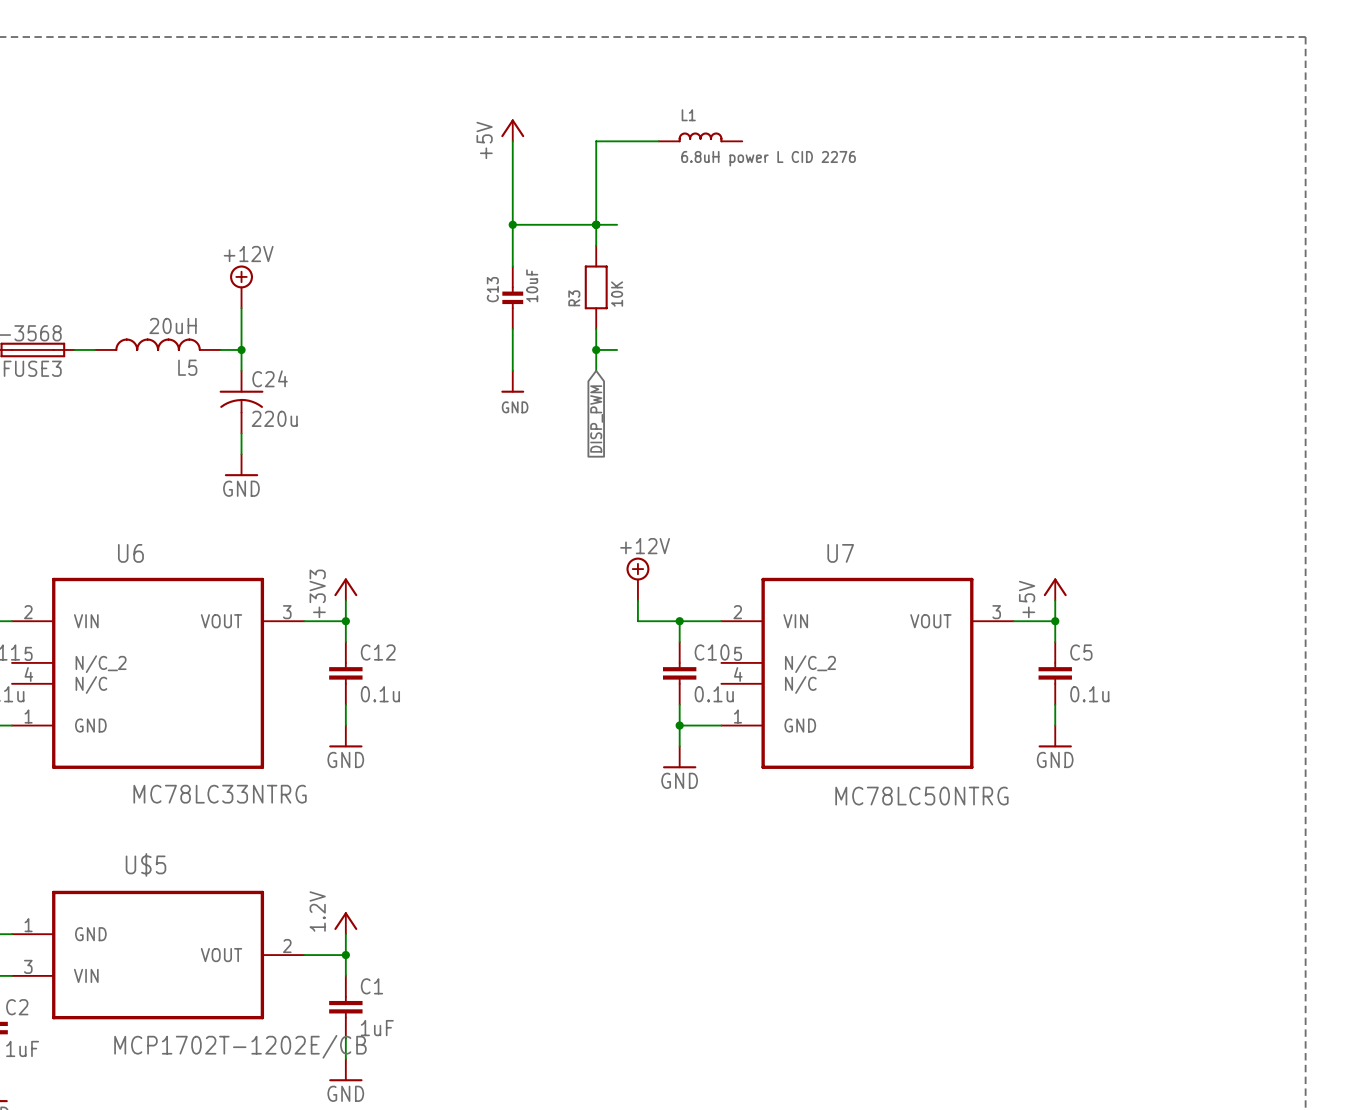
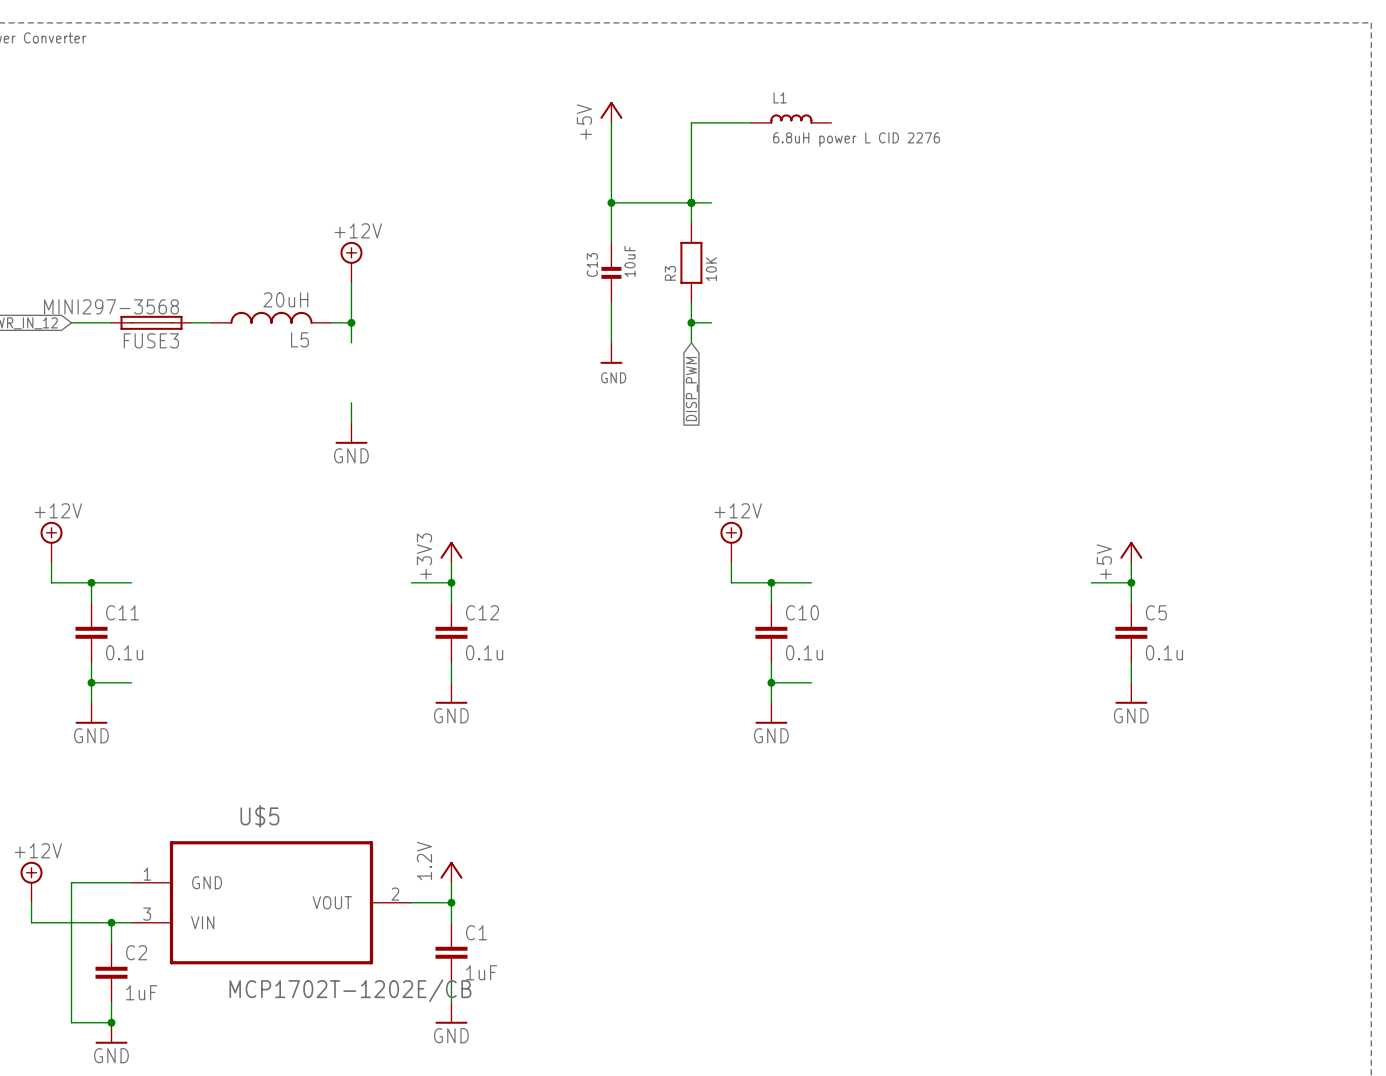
C24: 220u (241, 402) -> none
U6: MC78LC33NTRG (158, 673) -> none
U7: MC78LC50NTRG (867, 673) -> none

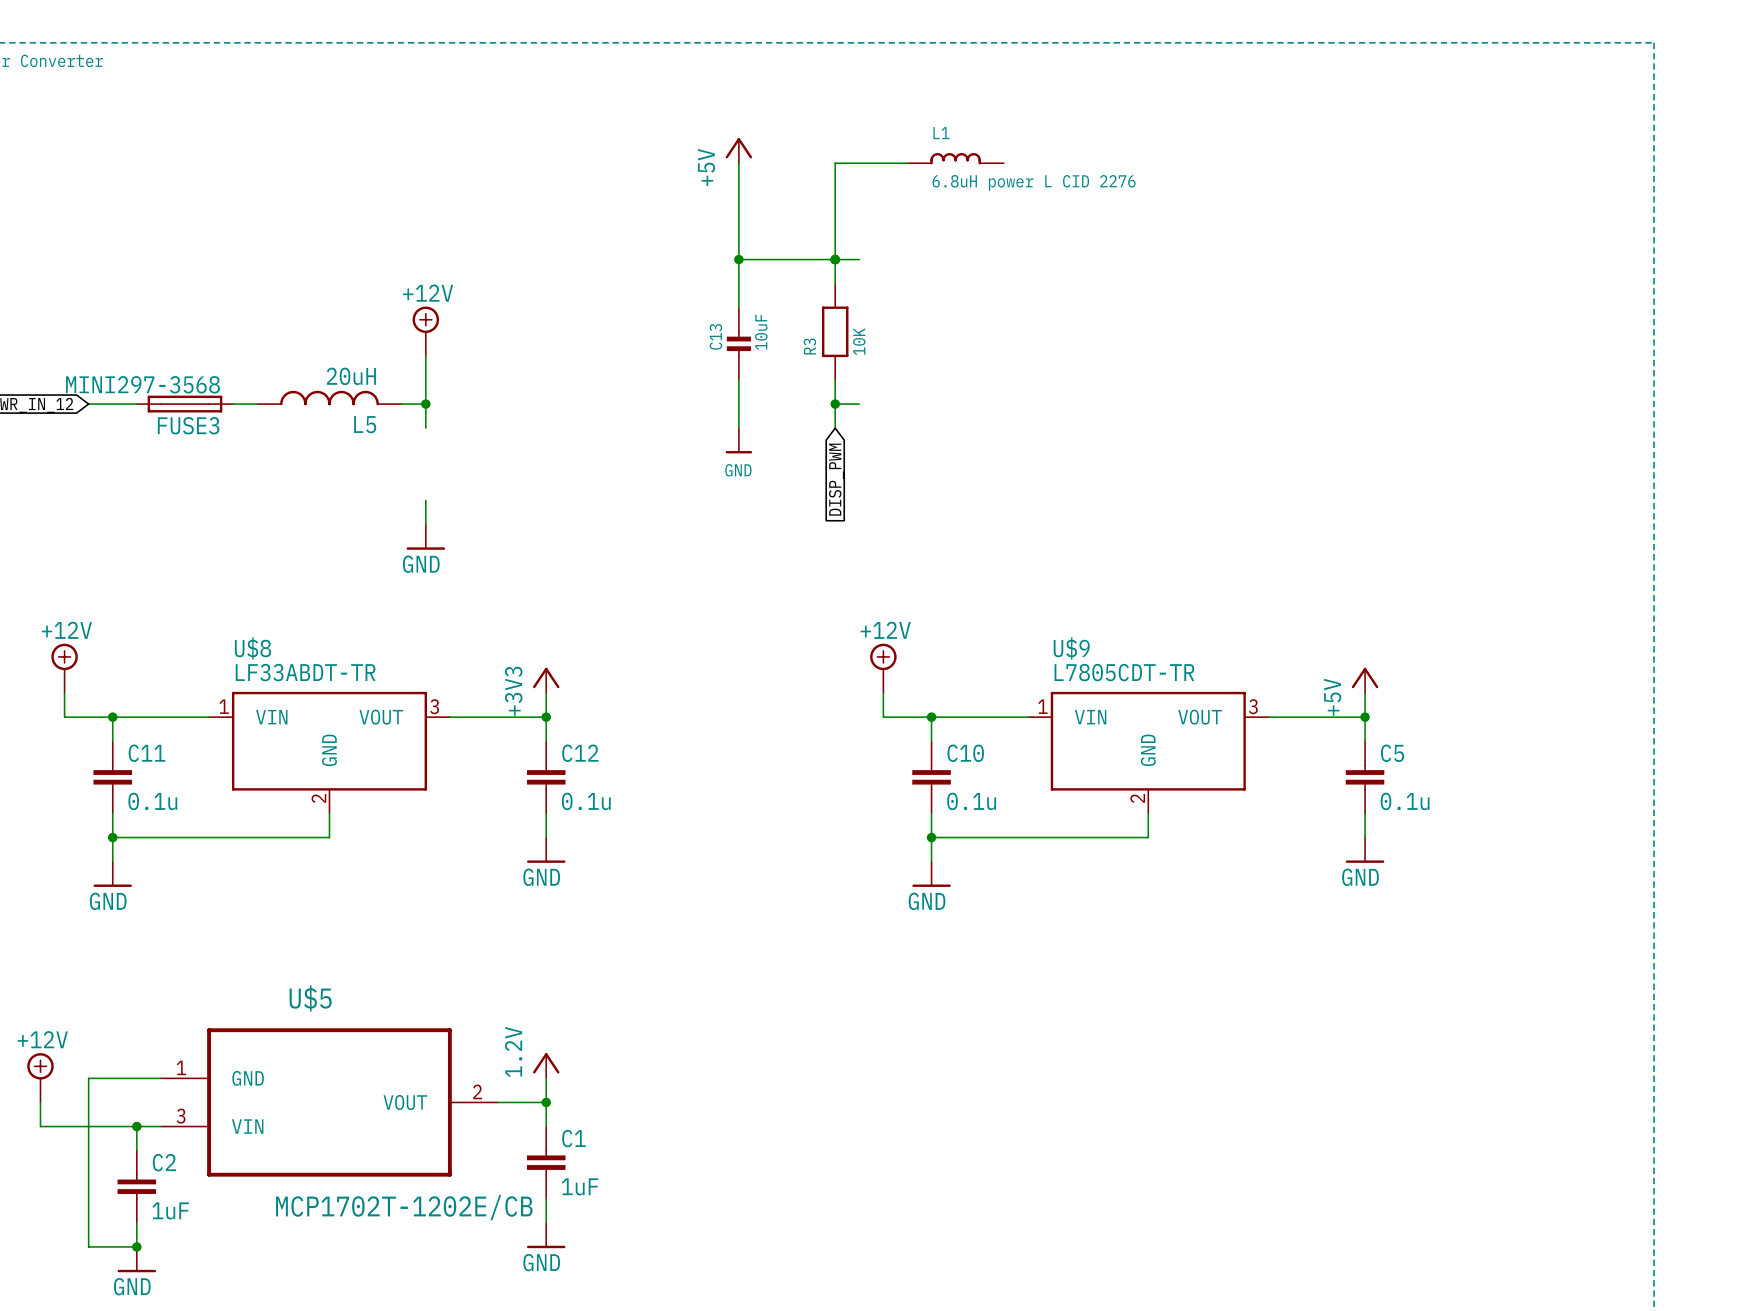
wire: none -> (160, 717) (209, 717)
wire: none -> (449, 717) (498, 717)
wire: none -> (979, 717) (1027, 717)
wire: none -> (1268, 717) (1316, 717)
U$8: none -> LF33ABDT-TR (329, 752)
U$9: none -> L7805CDT-TR (1148, 752)
wire: none -> (329, 813) (329, 837) (160, 837)
wire: none -> (1148, 813) (1148, 837) (979, 837)

